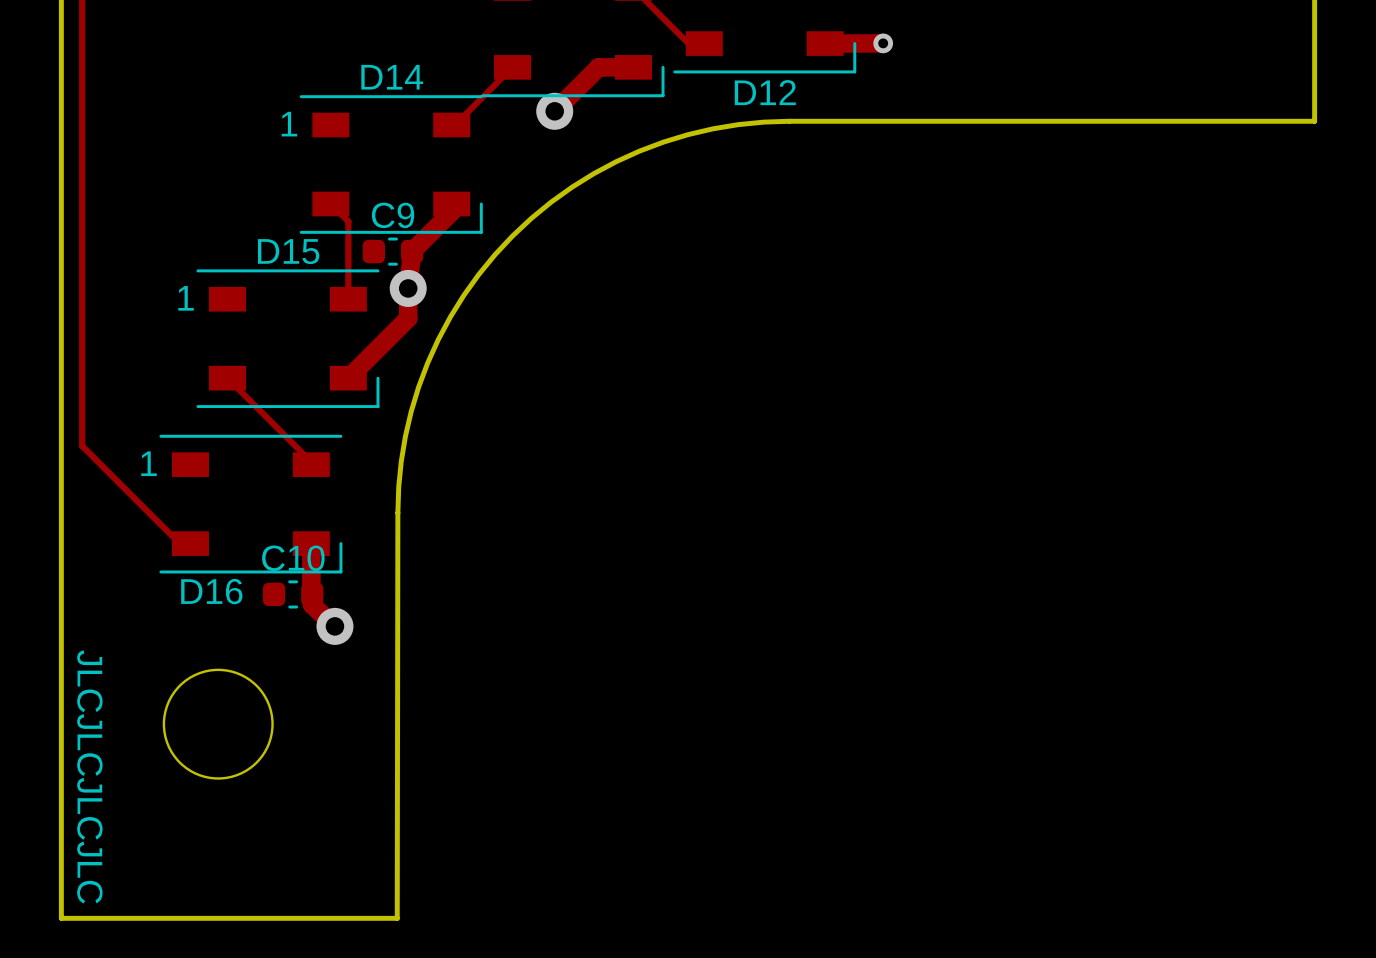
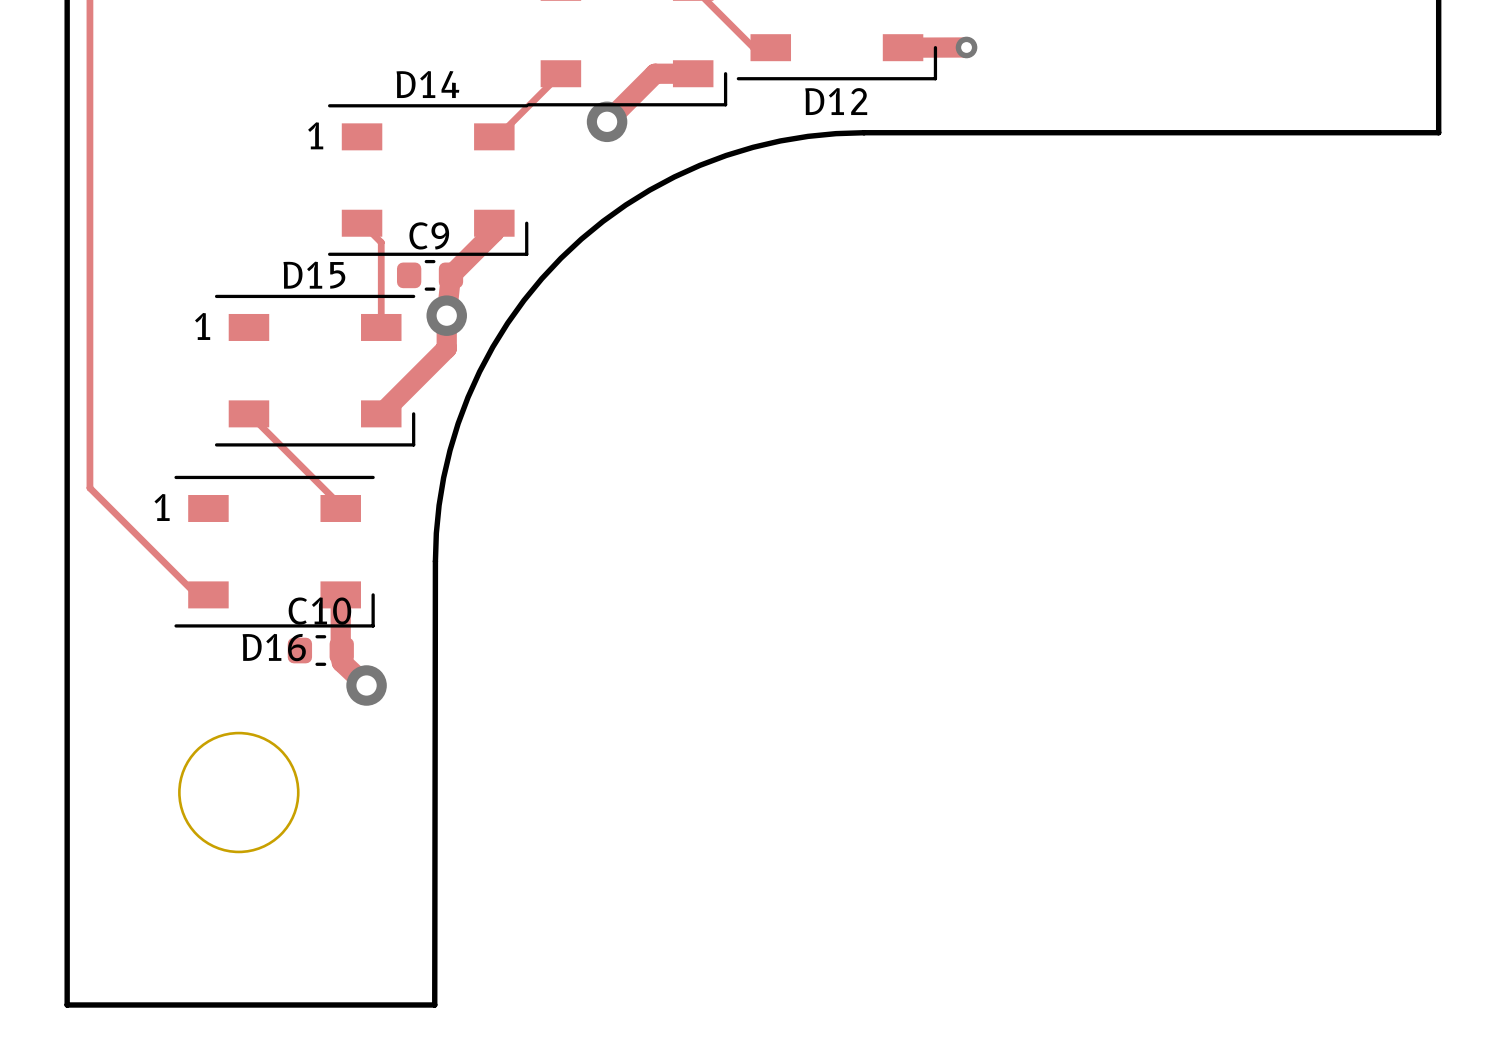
D16 name position: D16 (211, 591) -> D16 (274, 647)
text: JLCJLCJLCJLC (89, 776) -> none

